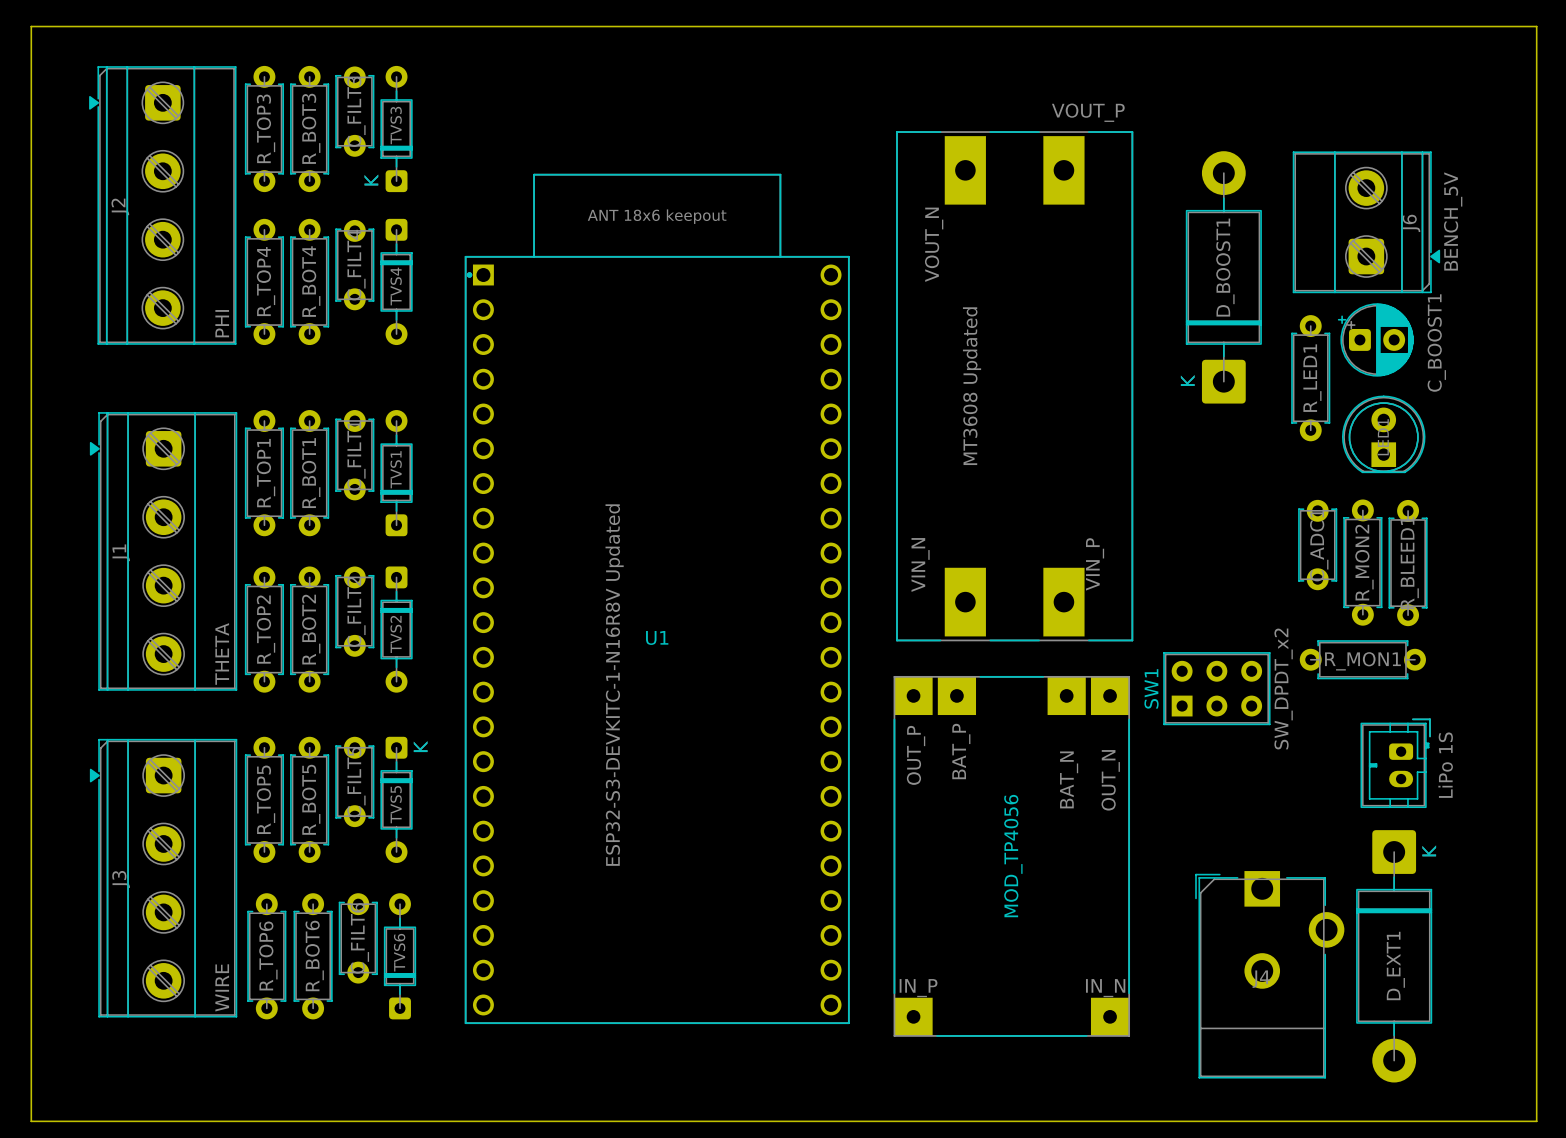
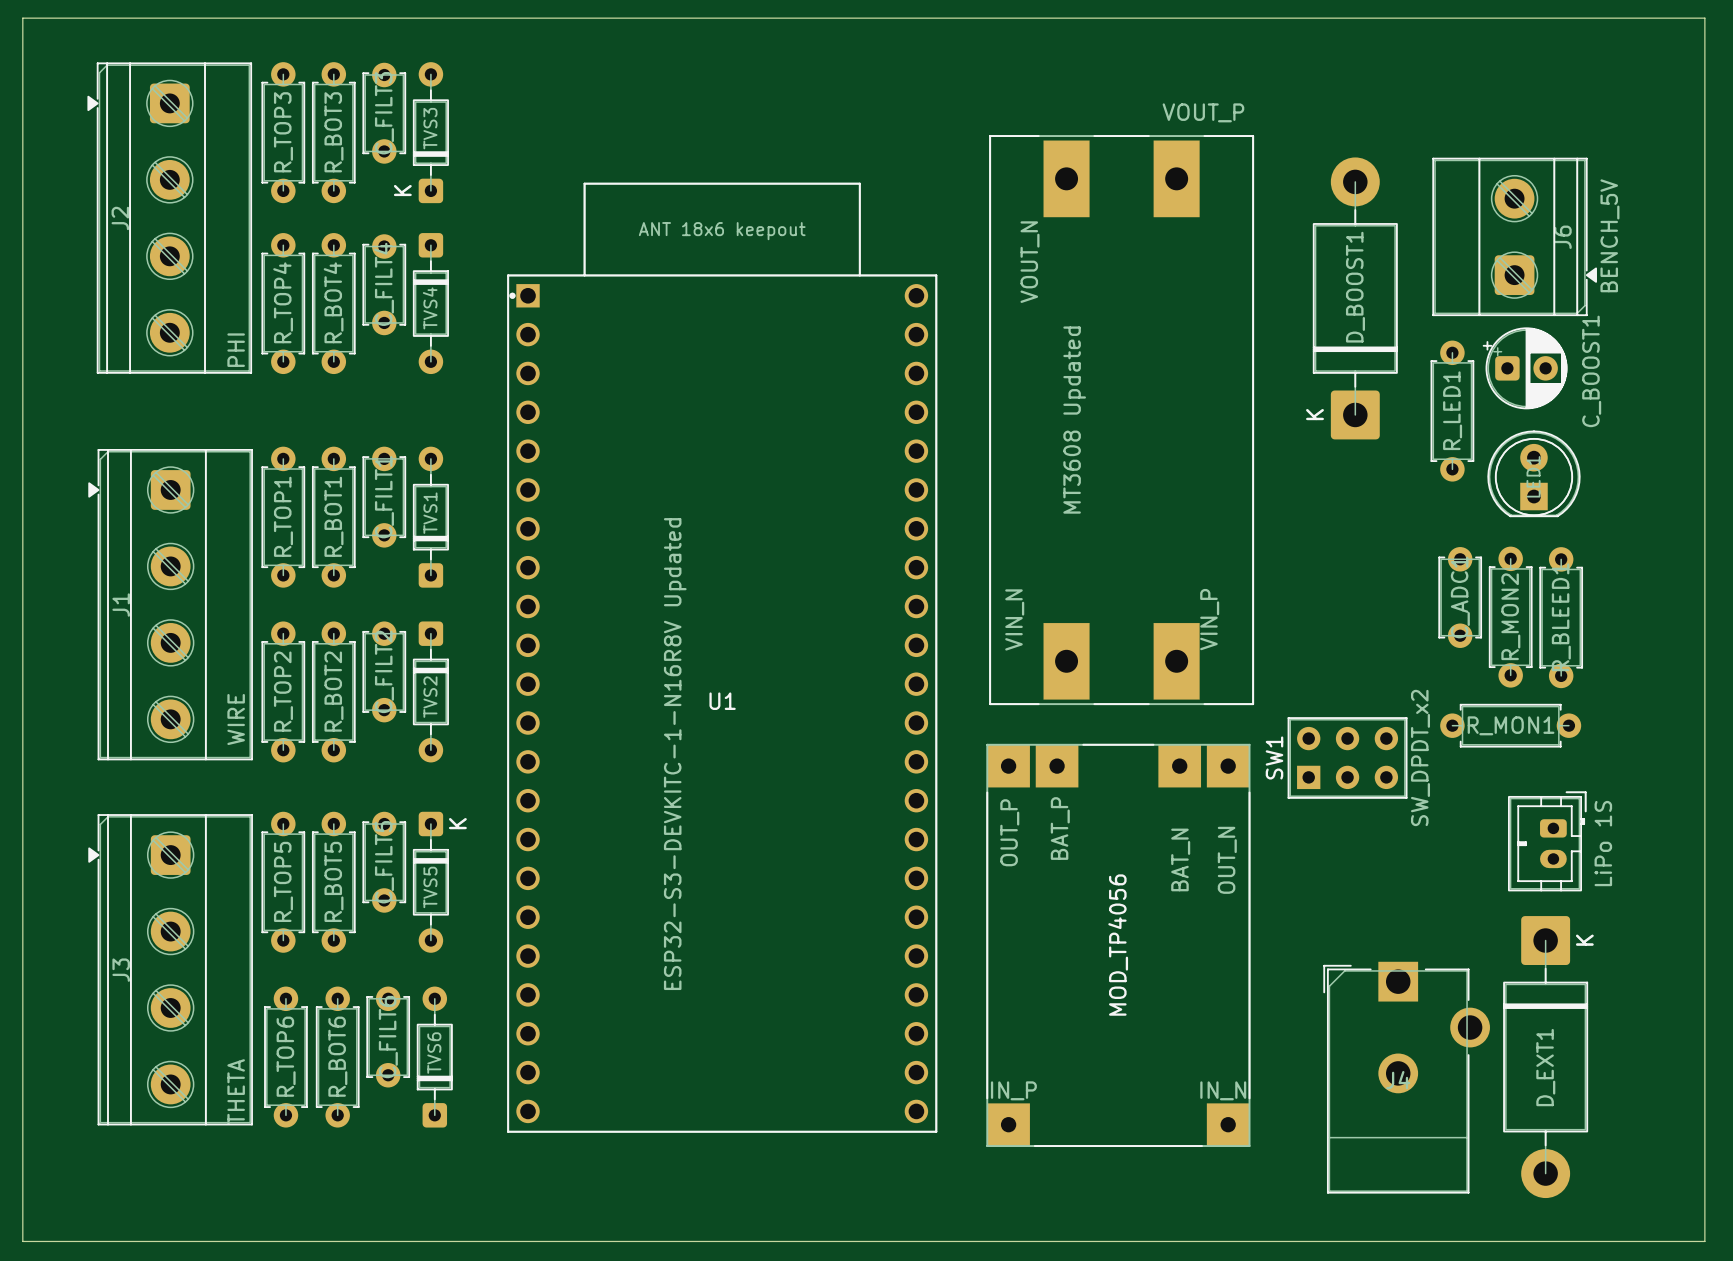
J1 value: THETA (222, 653) -> WIRE (236, 719)
J3 value: WIRE (222, 987) -> THETA (236, 1092)

